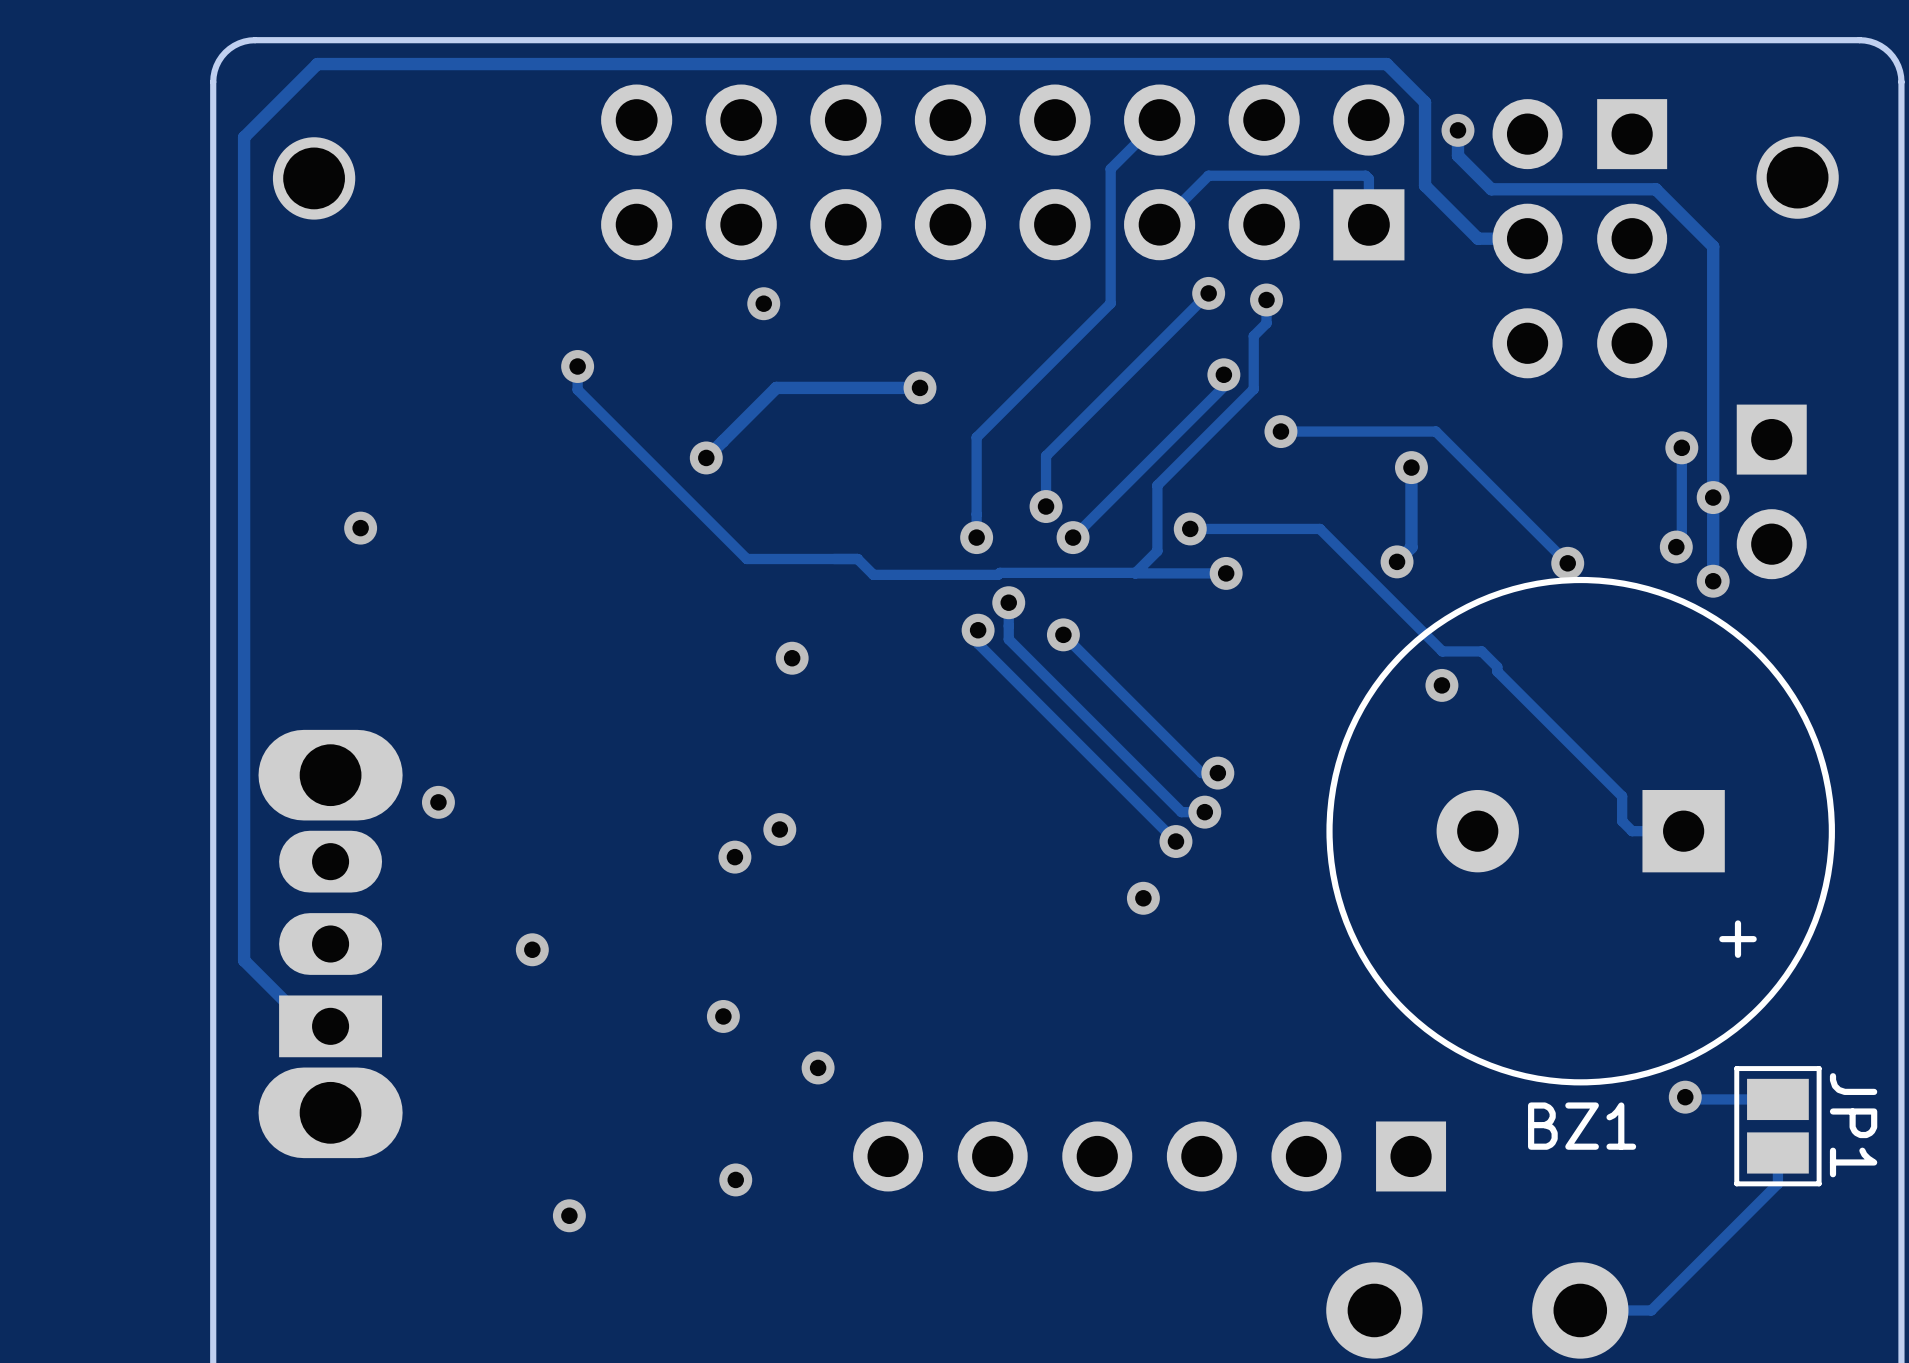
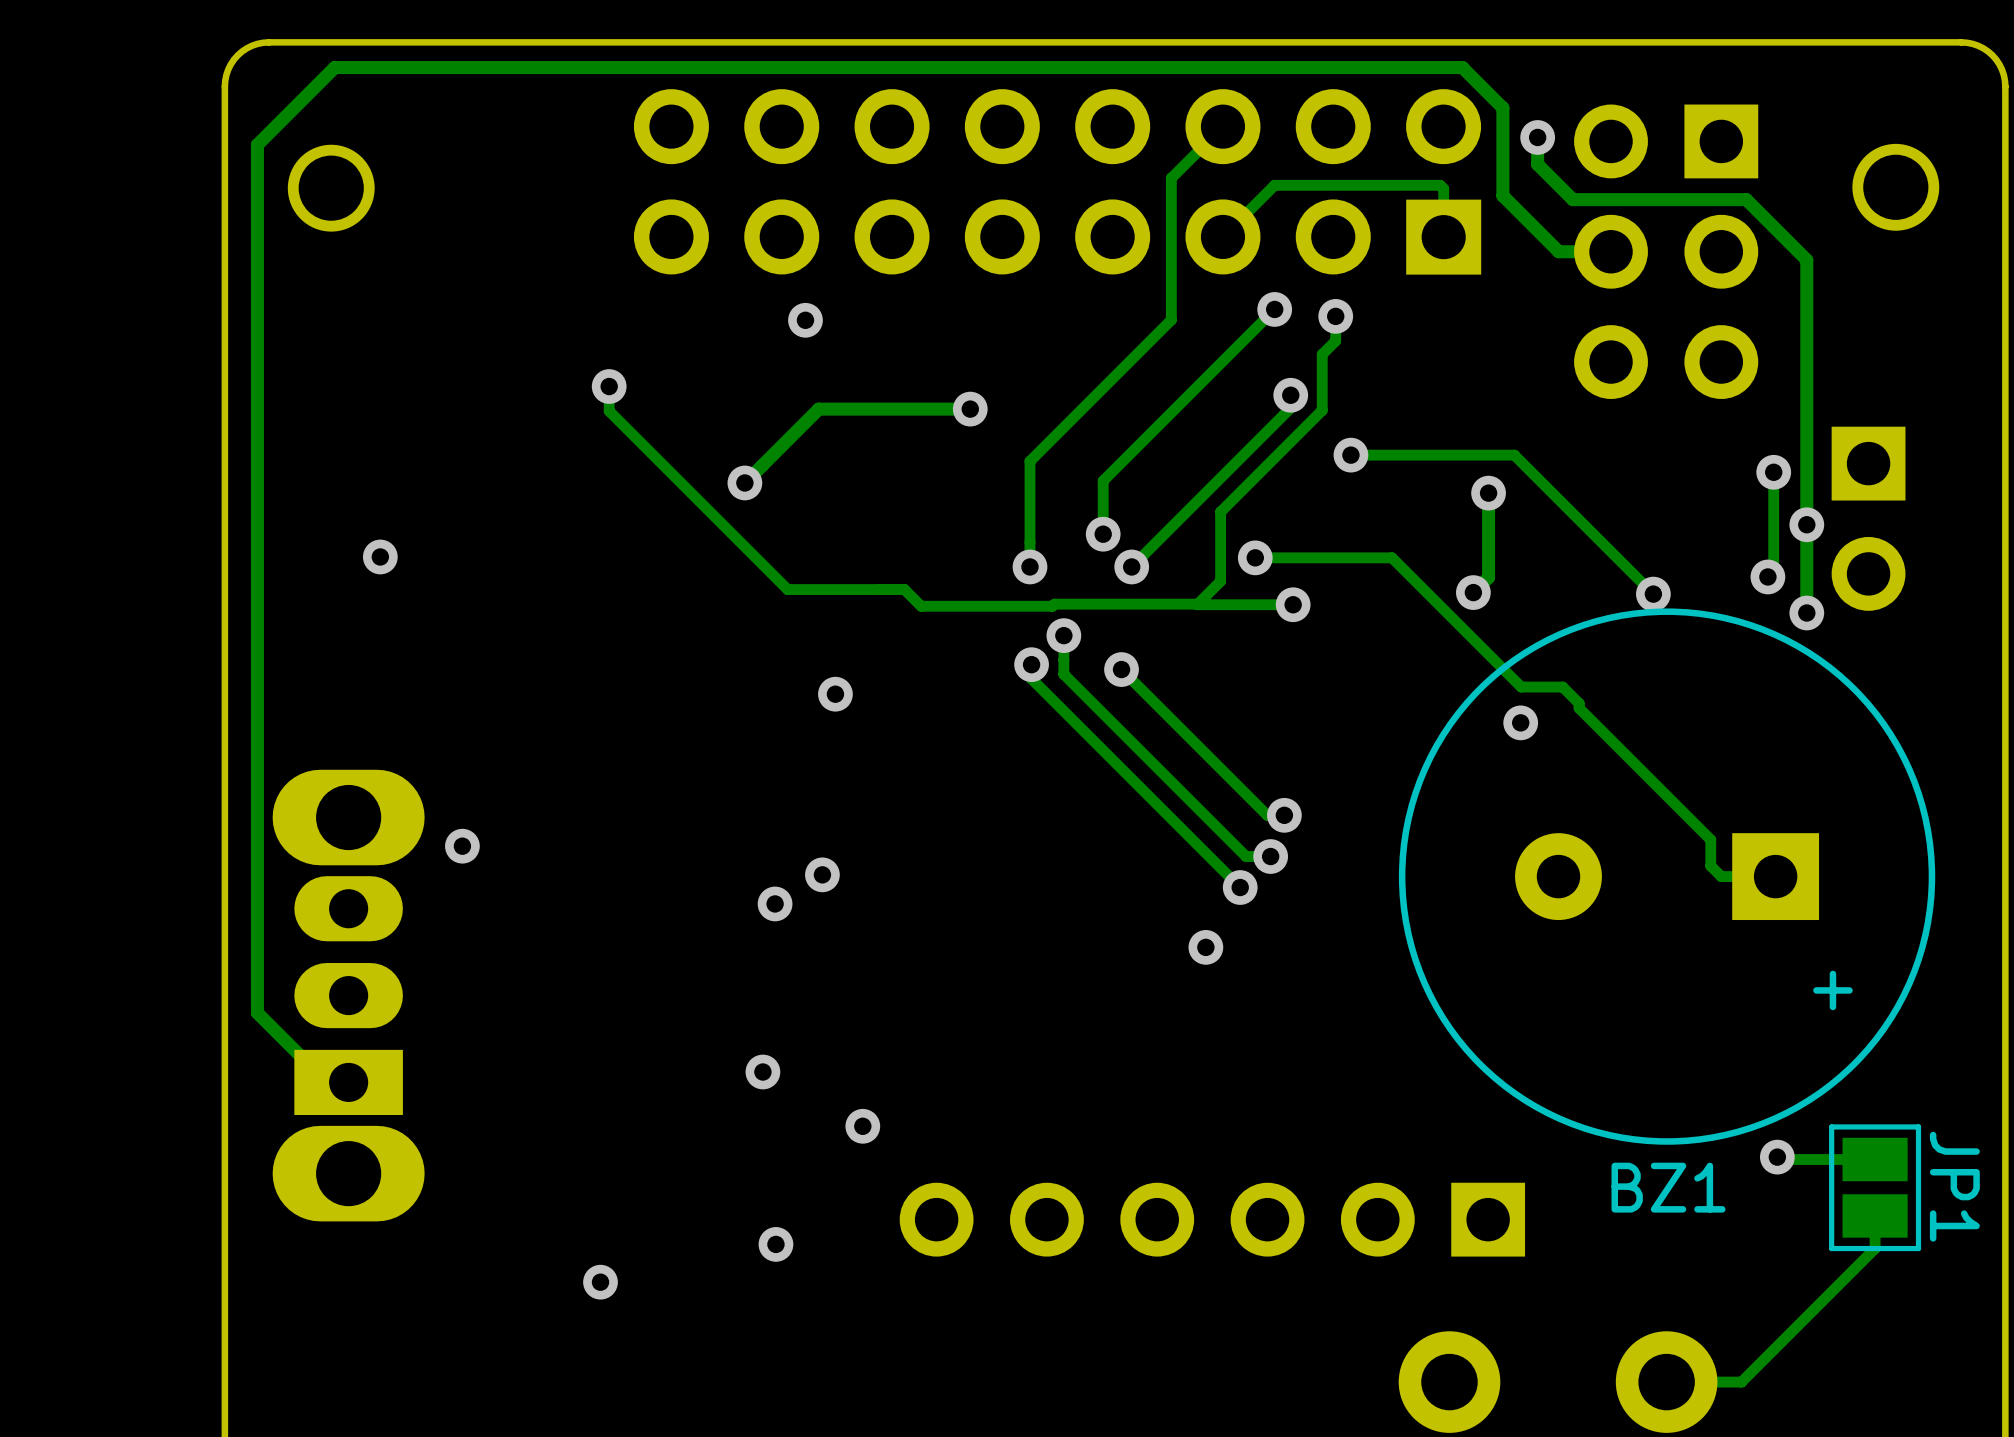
via: (532, 949) -> none

